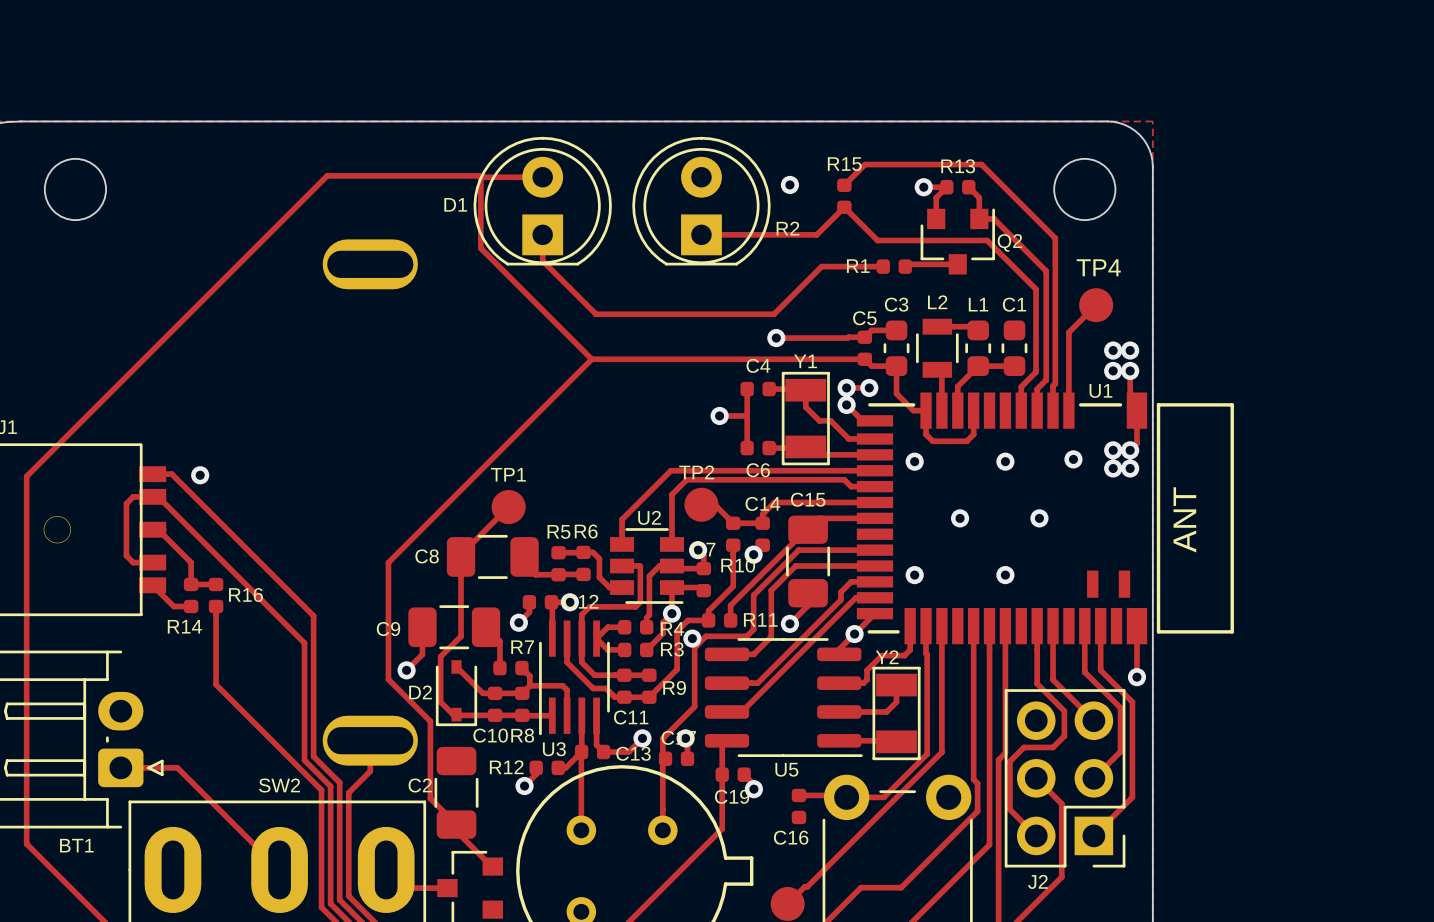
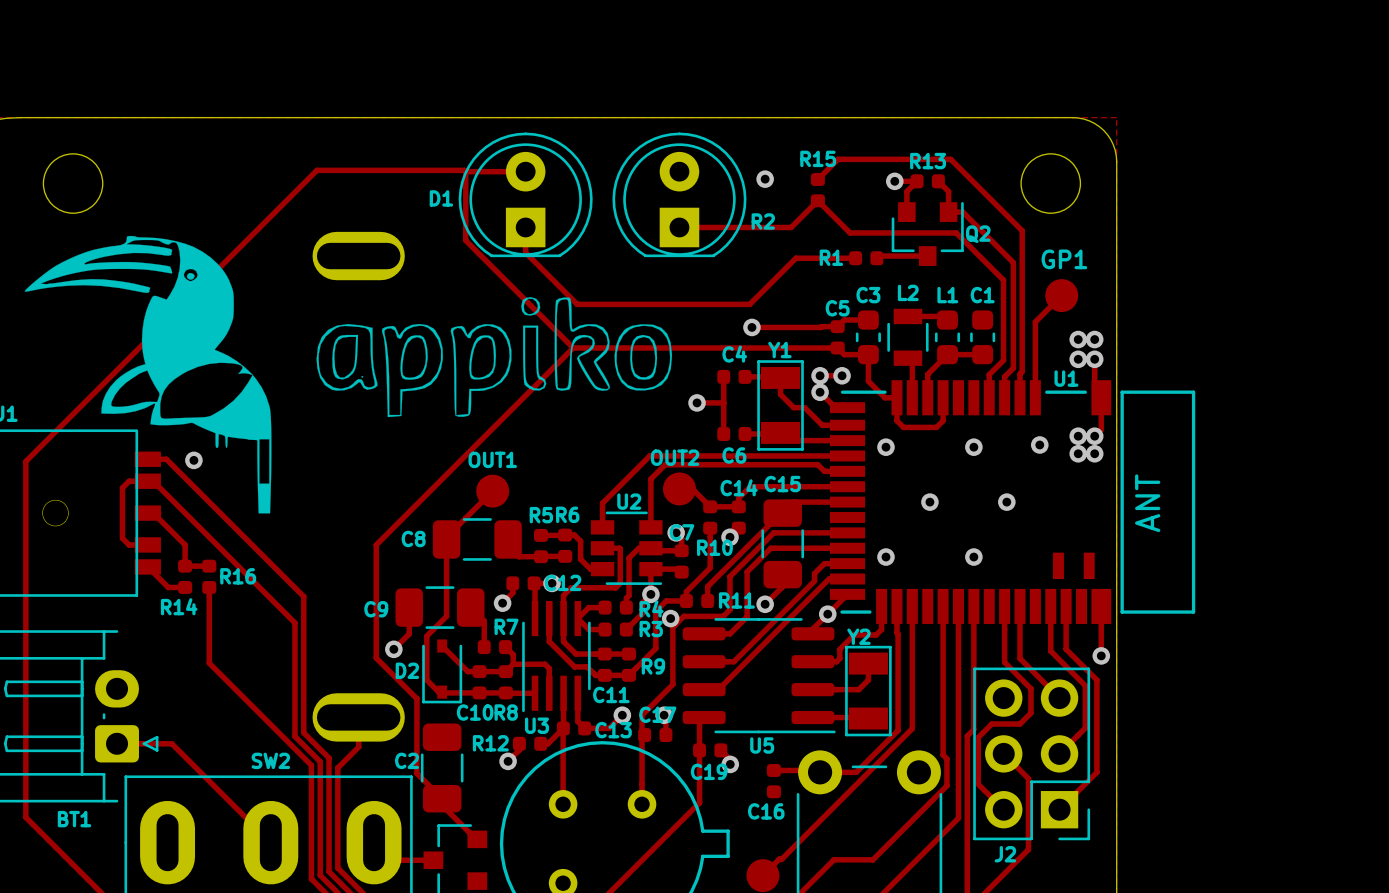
drawing: none -> [24, 235, 272, 514]
TP4 name: TP4 (1098, 267) -> GP1 (1064, 259)
drawing: none -> [316, 297, 673, 418]
TP2 name: TP2 (696, 472) -> OUT2 (675, 457)
TP1 name: TP1 (508, 474) -> OUT1 (492, 459)

